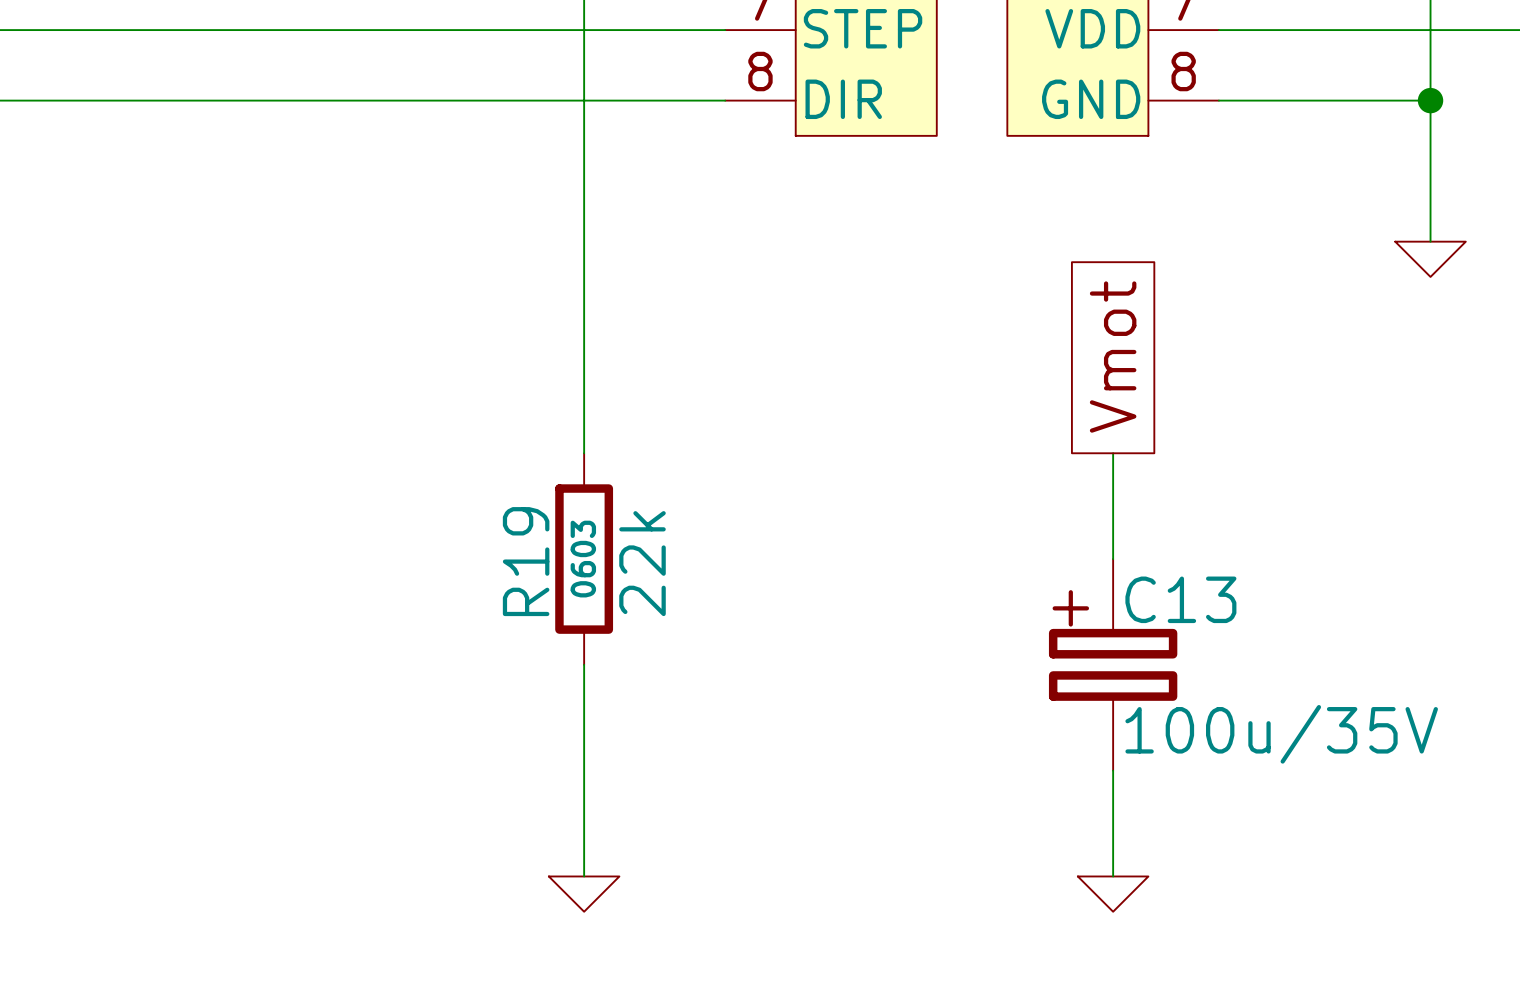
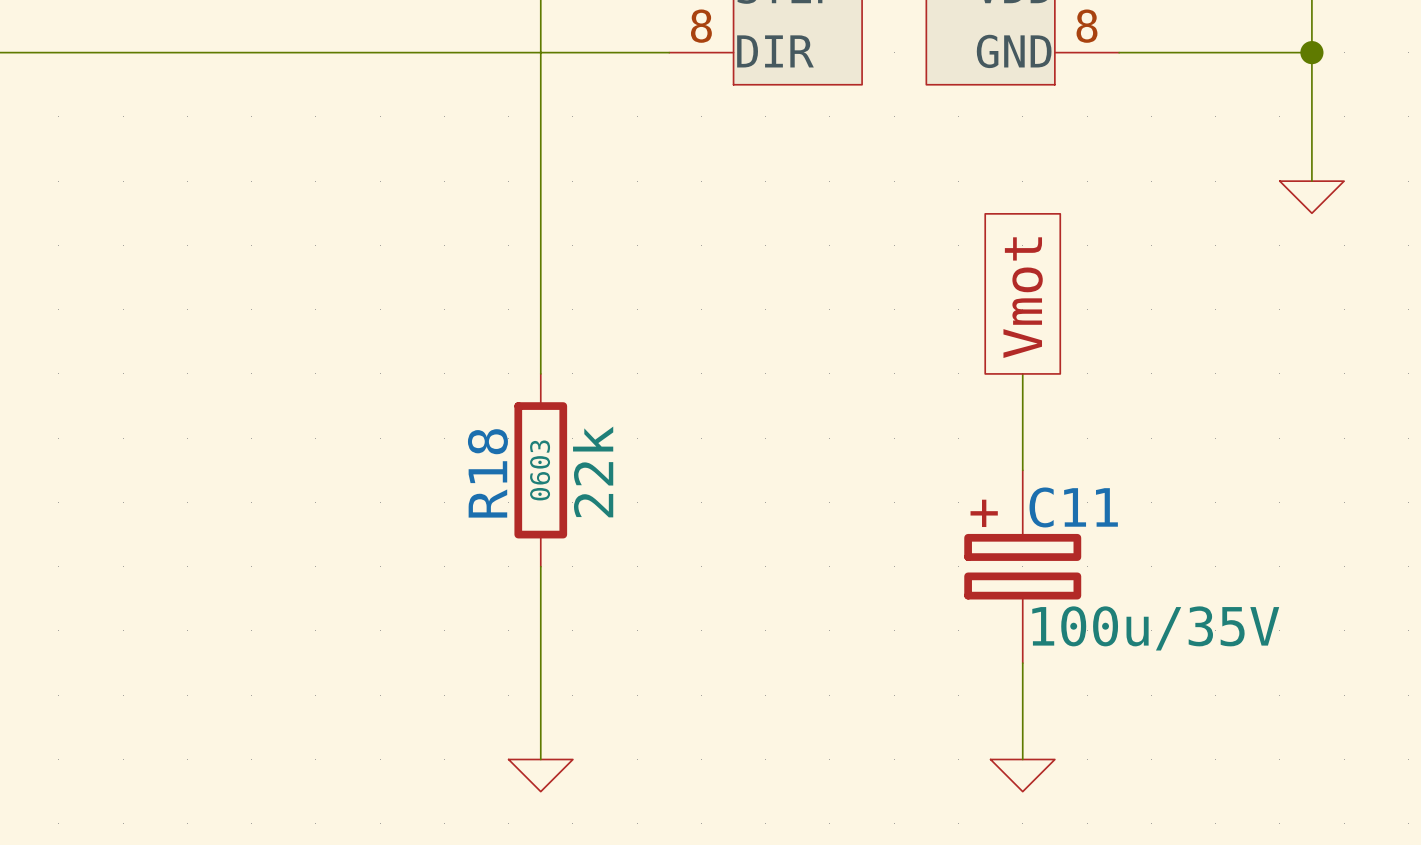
R19 name: R19 (526, 561) -> R18 (487, 473)
C13 name: C13 (1180, 599) -> C11 (1073, 507)

